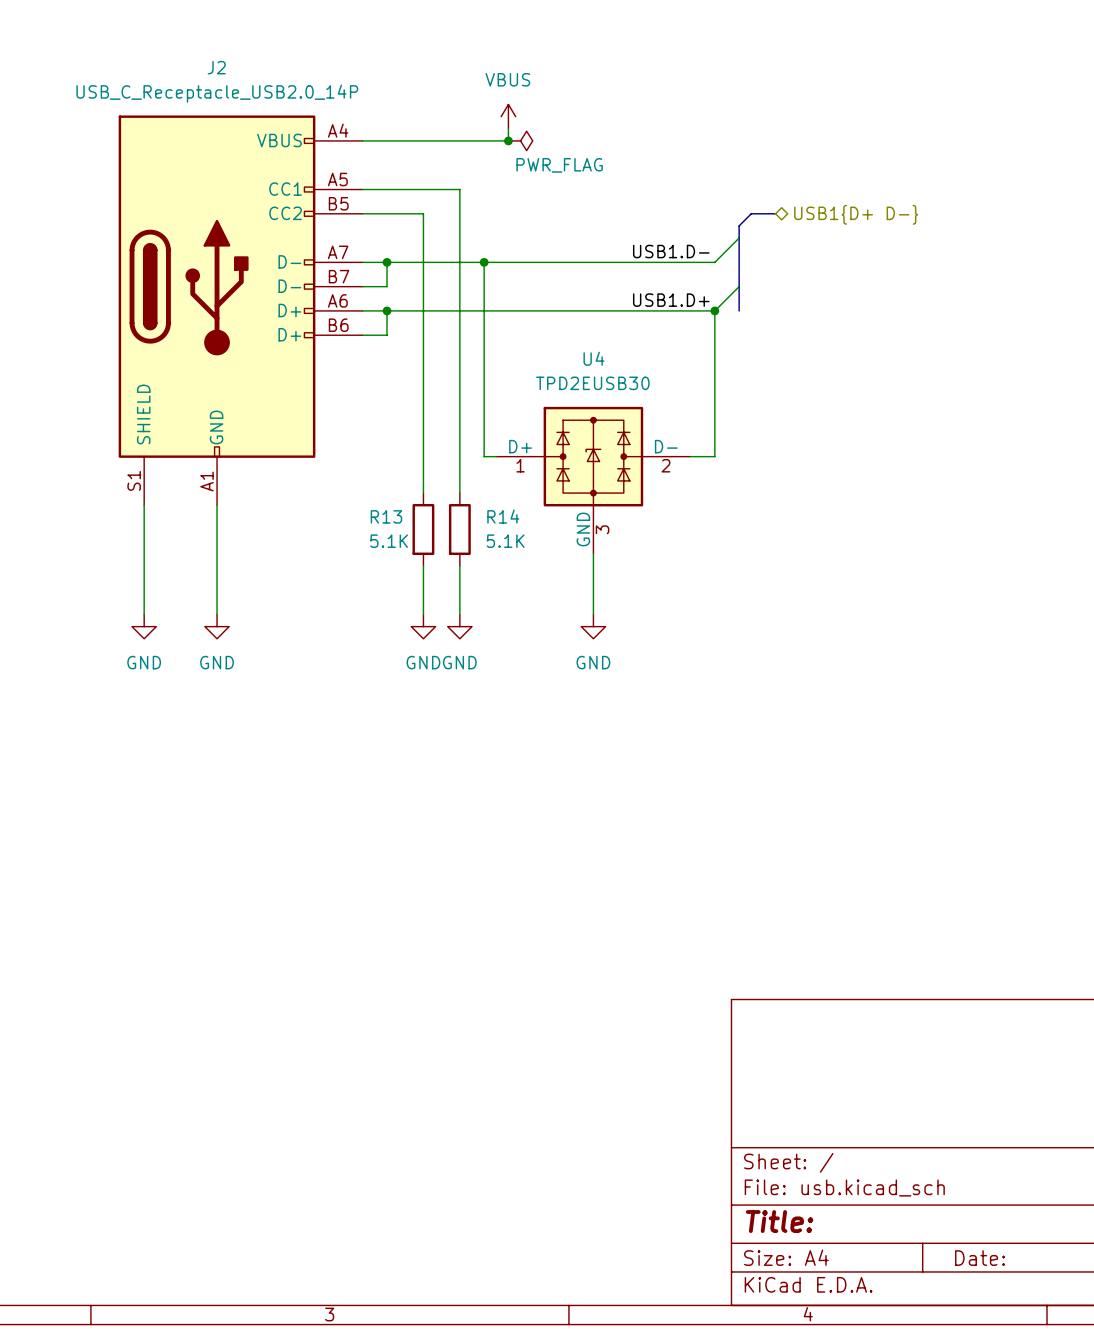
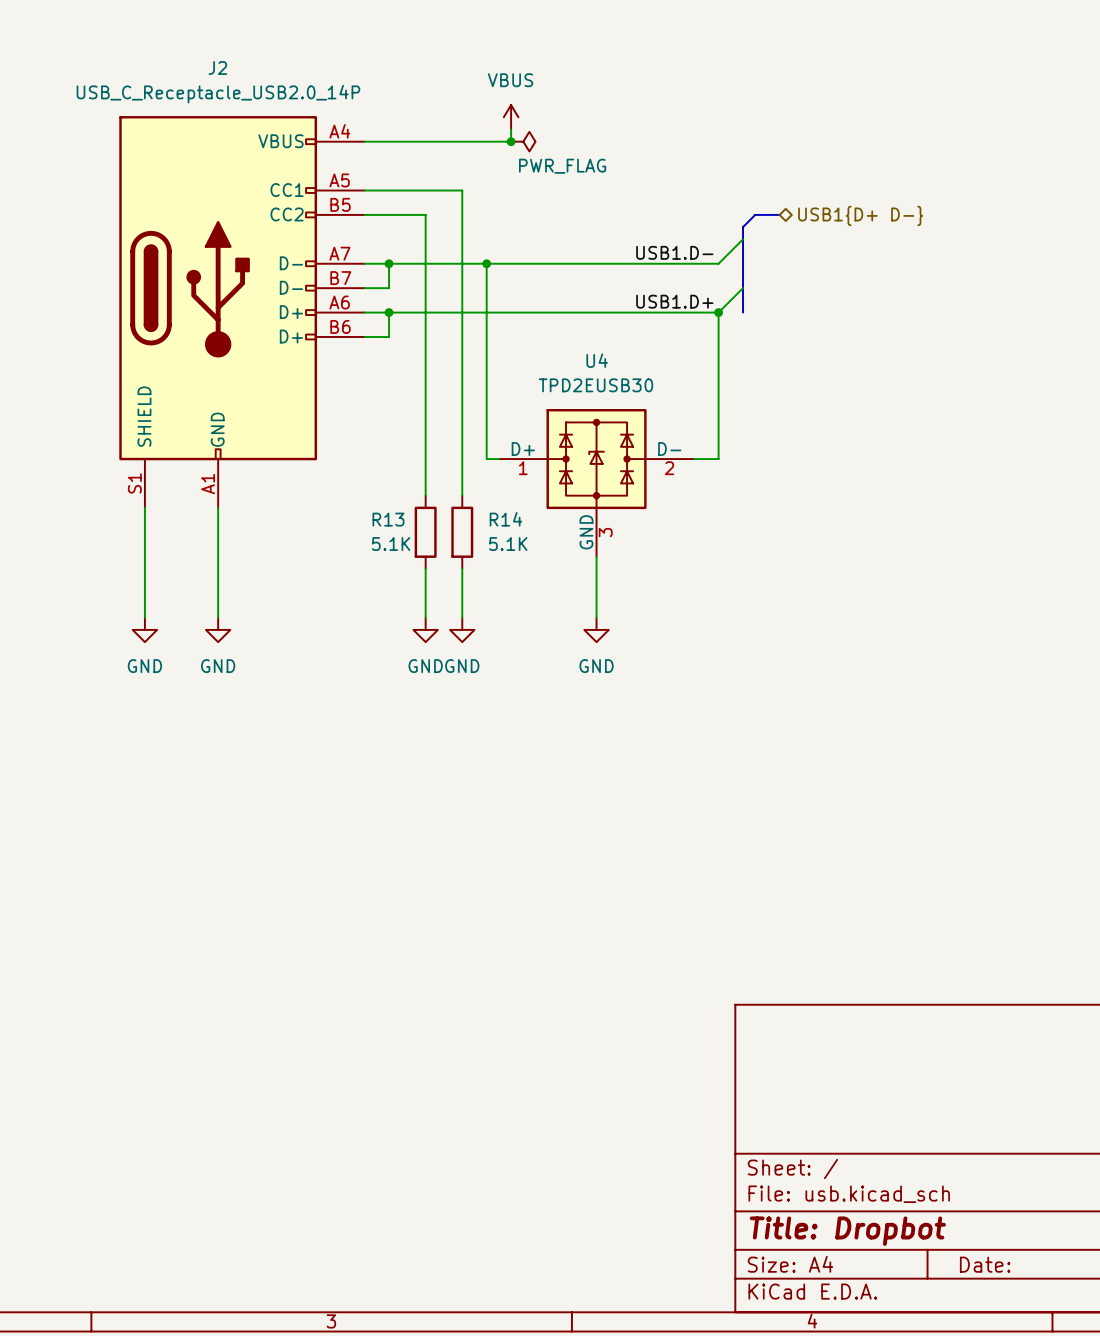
title block: Title: (779, 1221) -> Title: Dropbot (847, 1231)

